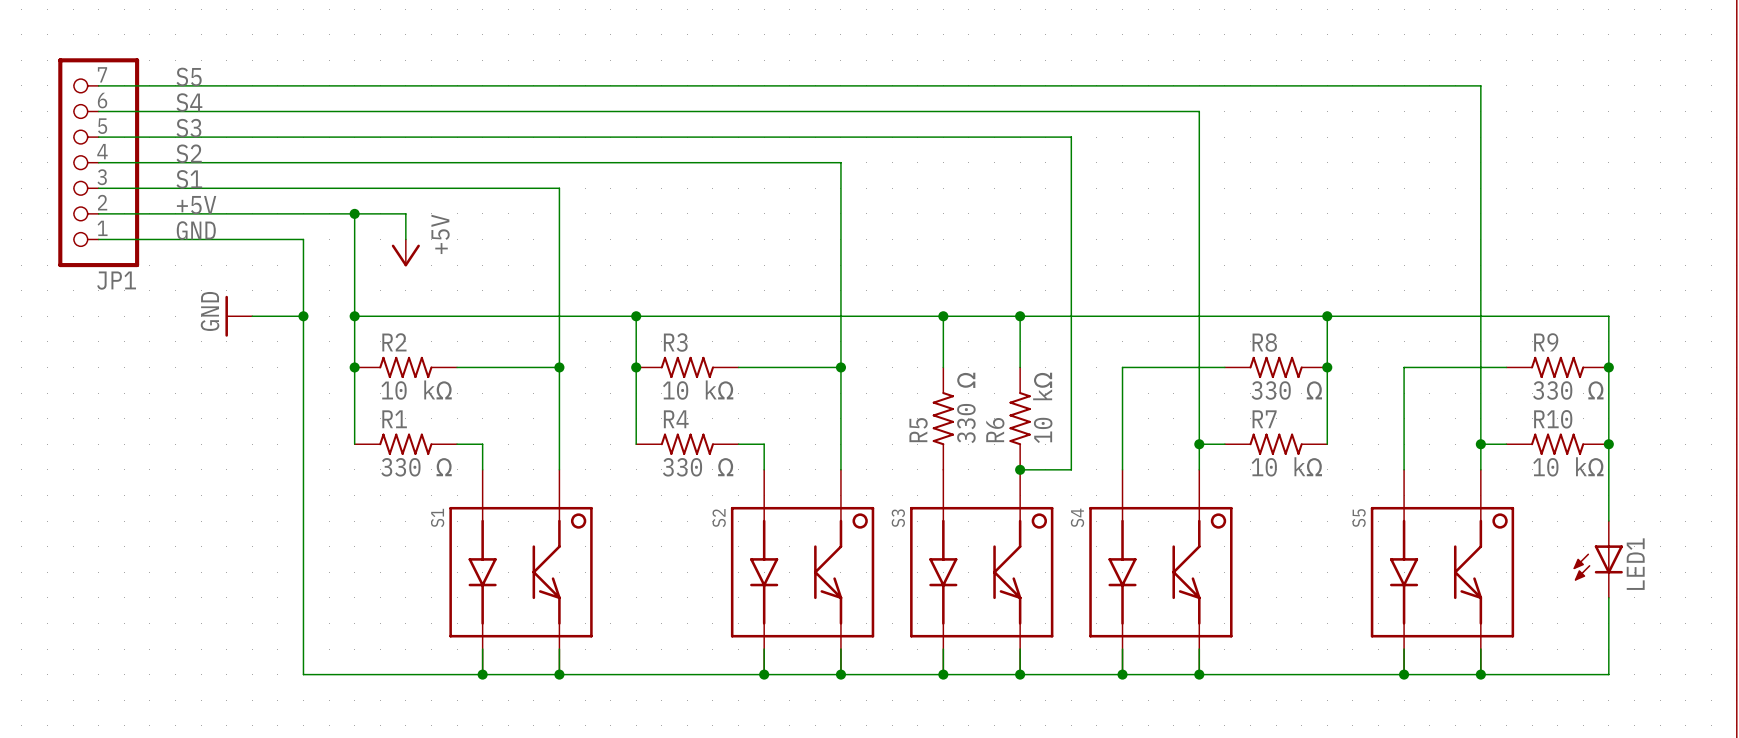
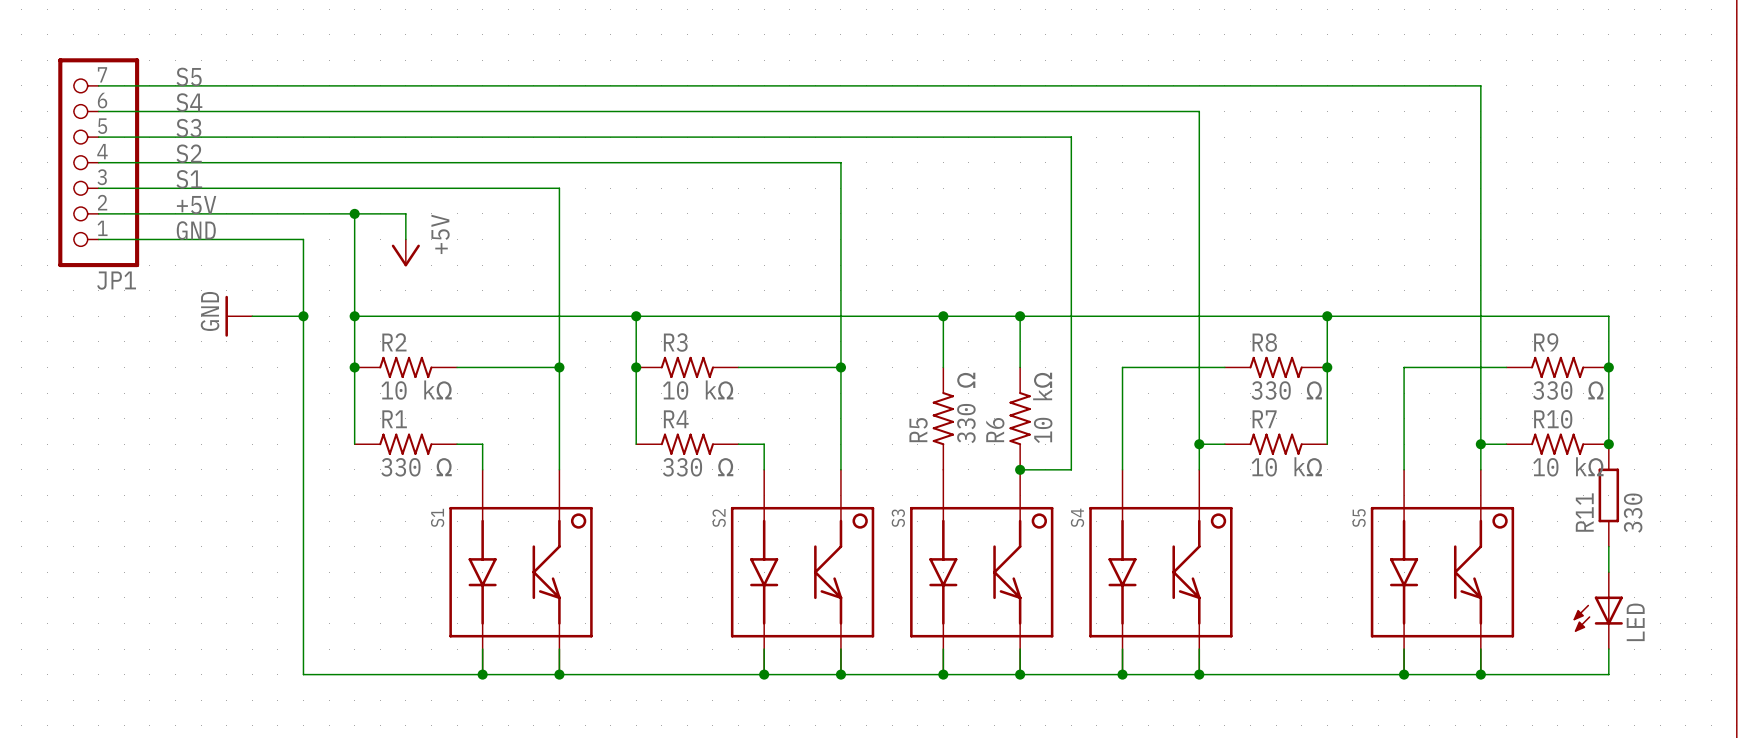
wire: (1608, 444) (1608, 521) -> none
R11: none -> 330 (1608, 495)
LED1: (1598, 559) -> none
LED: none -> (1598, 610)

